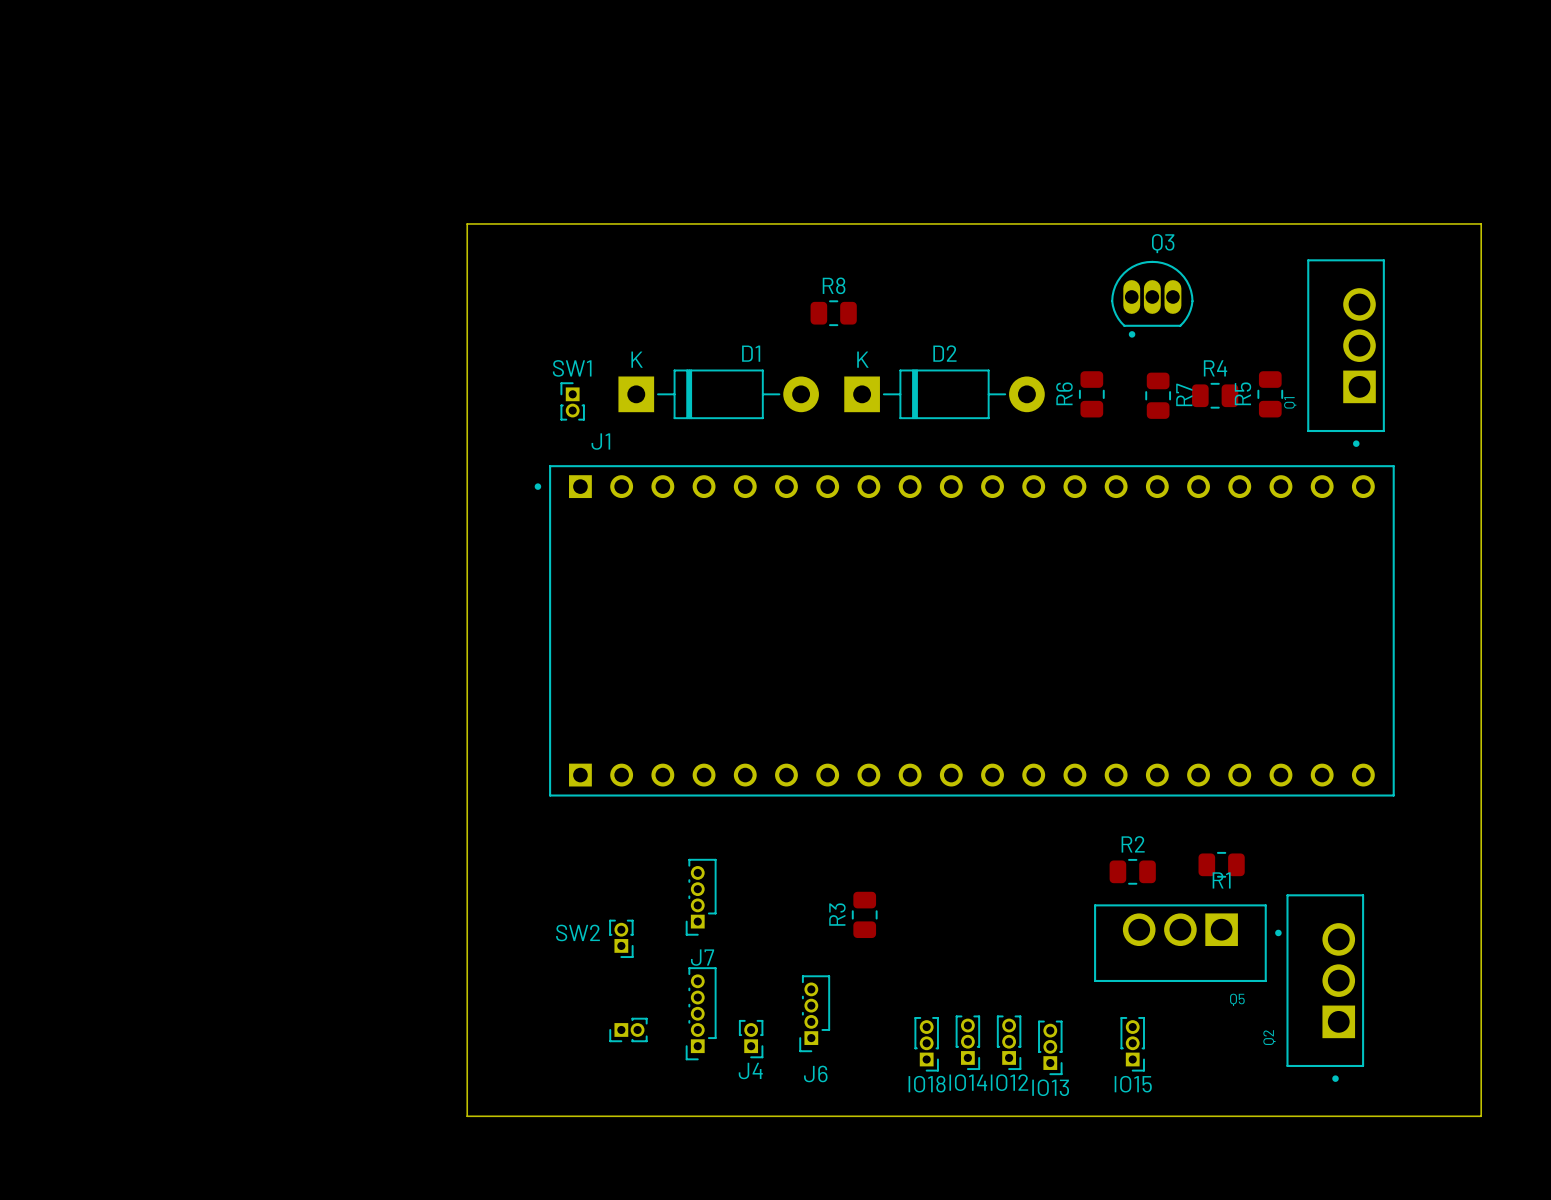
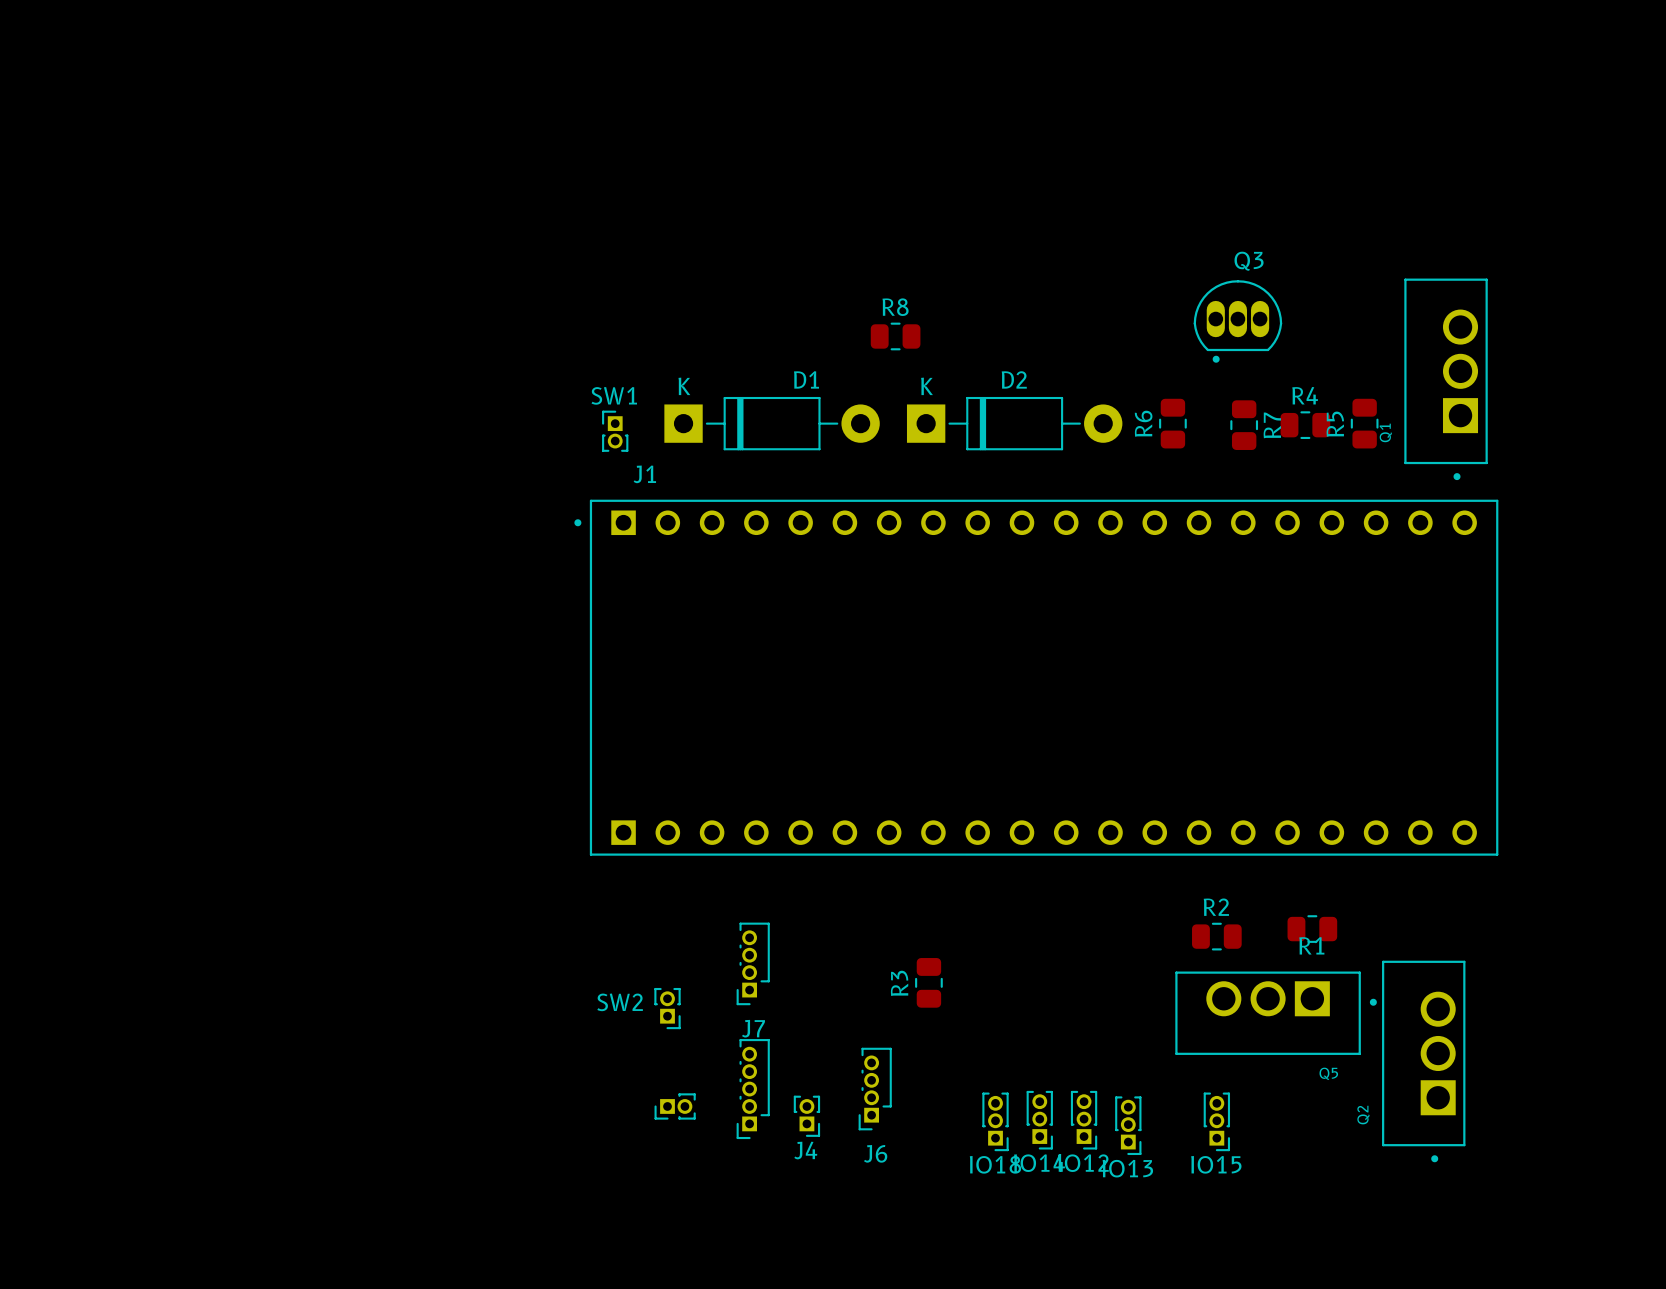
board edge: (467, 223) (1481, 223) (1481, 1116) (467, 1116) (467, 223) -> none

